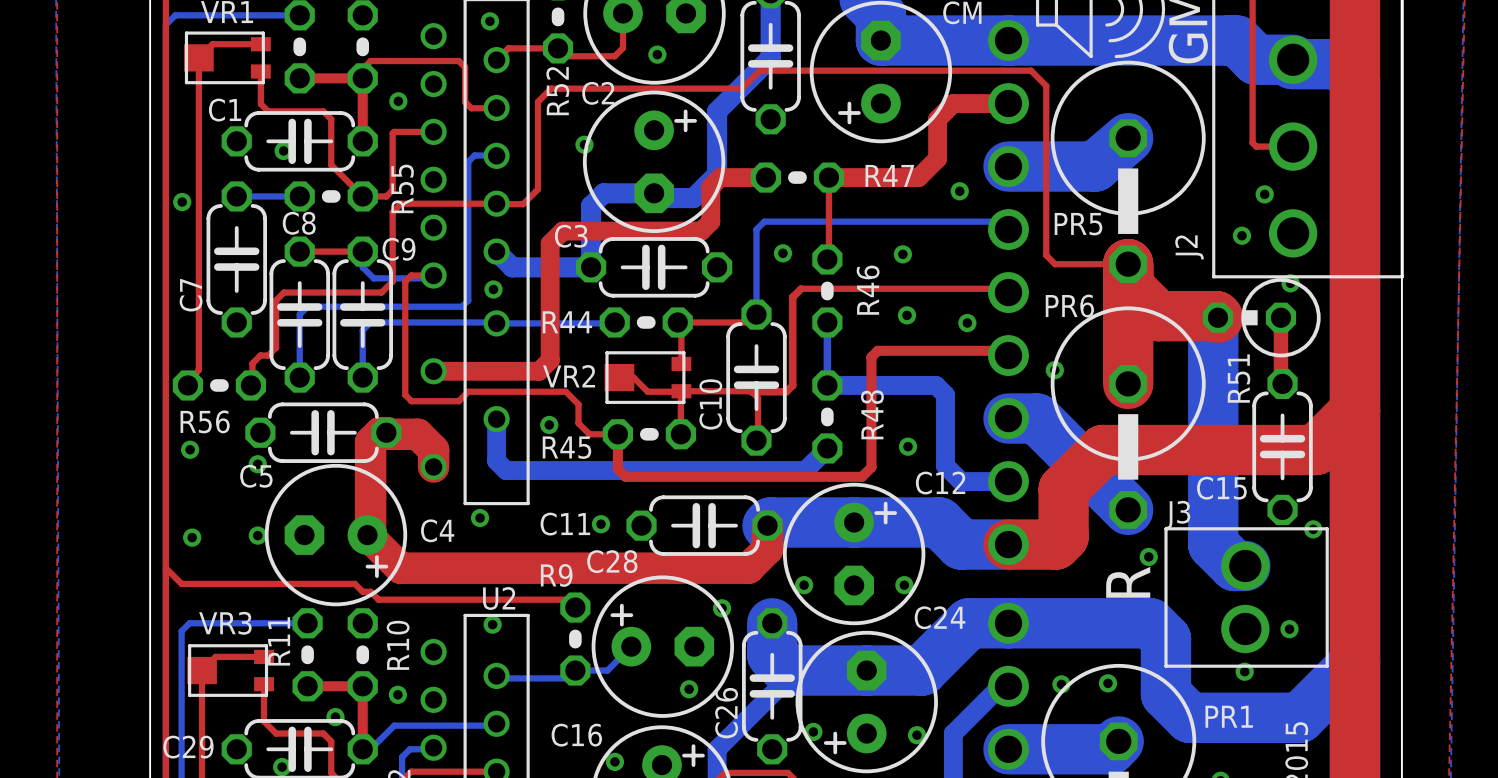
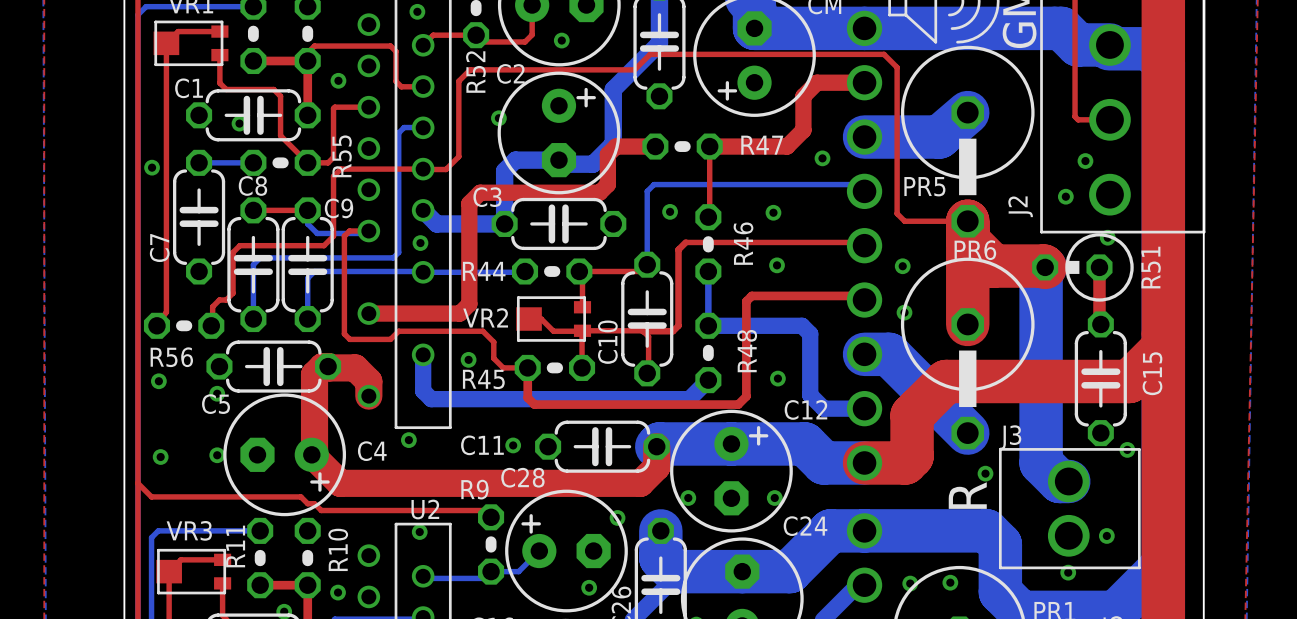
PR6 name position: PR6 (1069, 306) -> PR6 (975, 250)
via position: (967, 323) -> (902, 266)
R51 name position: R51 (1239, 378) -> R51 (1151, 267)
C15 name rotation: 0° (1221, 488) -> 90° counterclockwise (1152, 373)
C15 name position: C15 (1221, 488) -> C15 (1152, 373)

